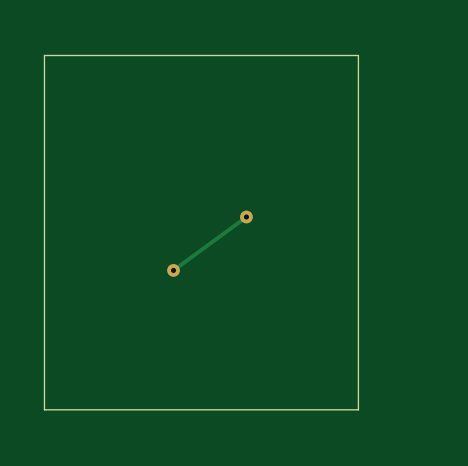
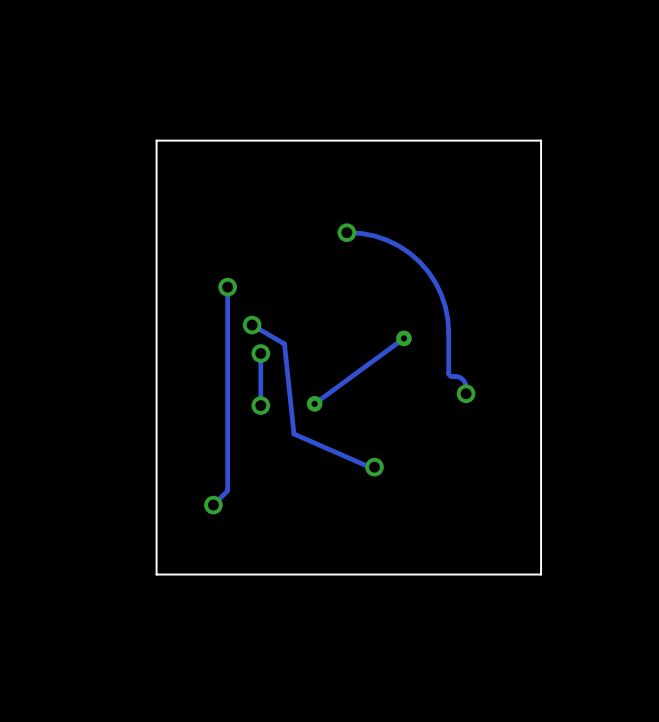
track: none -> (346, 232) (362, 233) (387, 240) (409, 253) (428, 271) (441, 294) (445, 306) (448, 332) (448, 374) (463, 380) (466, 393)
via: none -> (346, 232)
track: none -> (227, 287) (227, 490) (213, 505)
via: none -> (227, 287)
track: none -> (252, 325) (284, 344) (293, 434) (369, 467) (374, 467)
via: none -> (252, 325)
track: none -> (260, 353) (260, 405)
via: none -> (260, 353)
via: none -> (466, 393)
via: none -> (260, 405)
via: none -> (374, 467)
via: none -> (213, 505)

